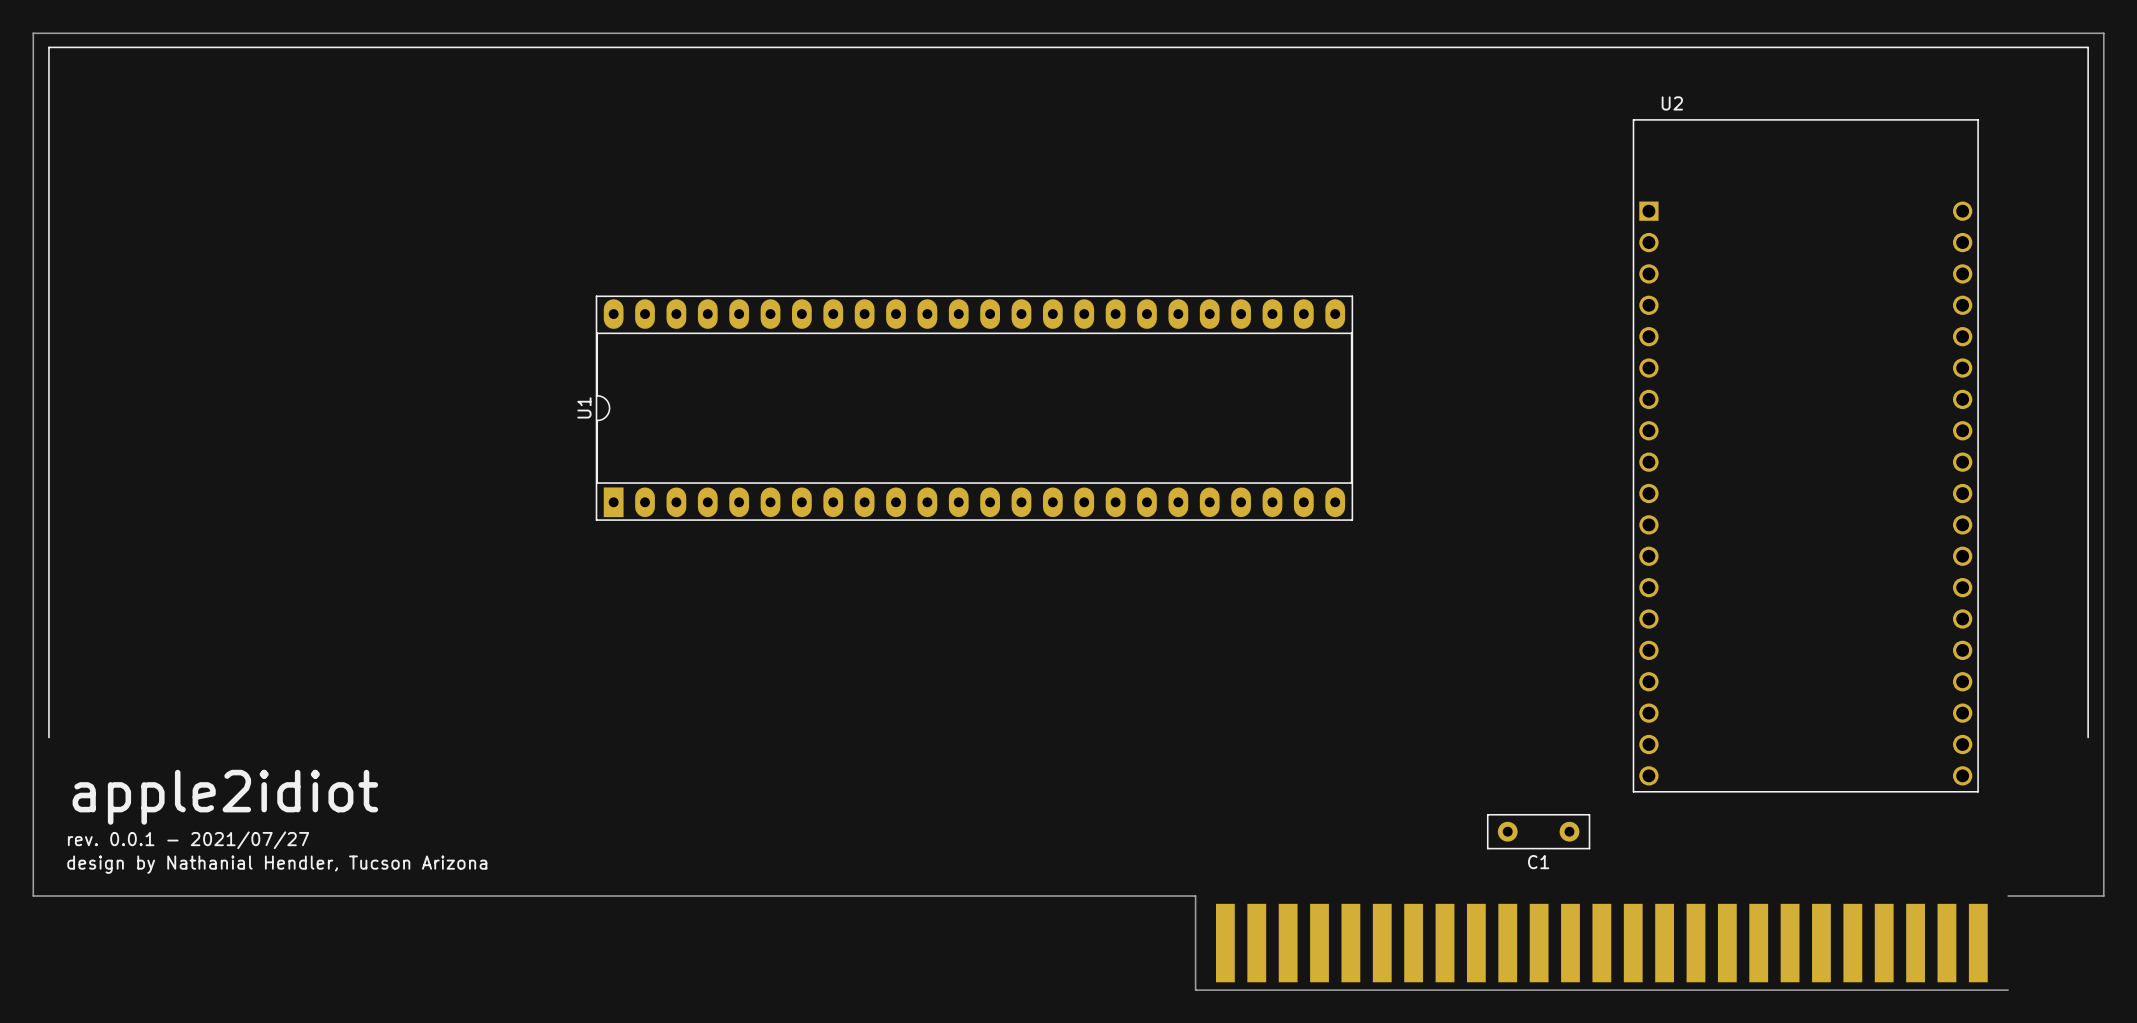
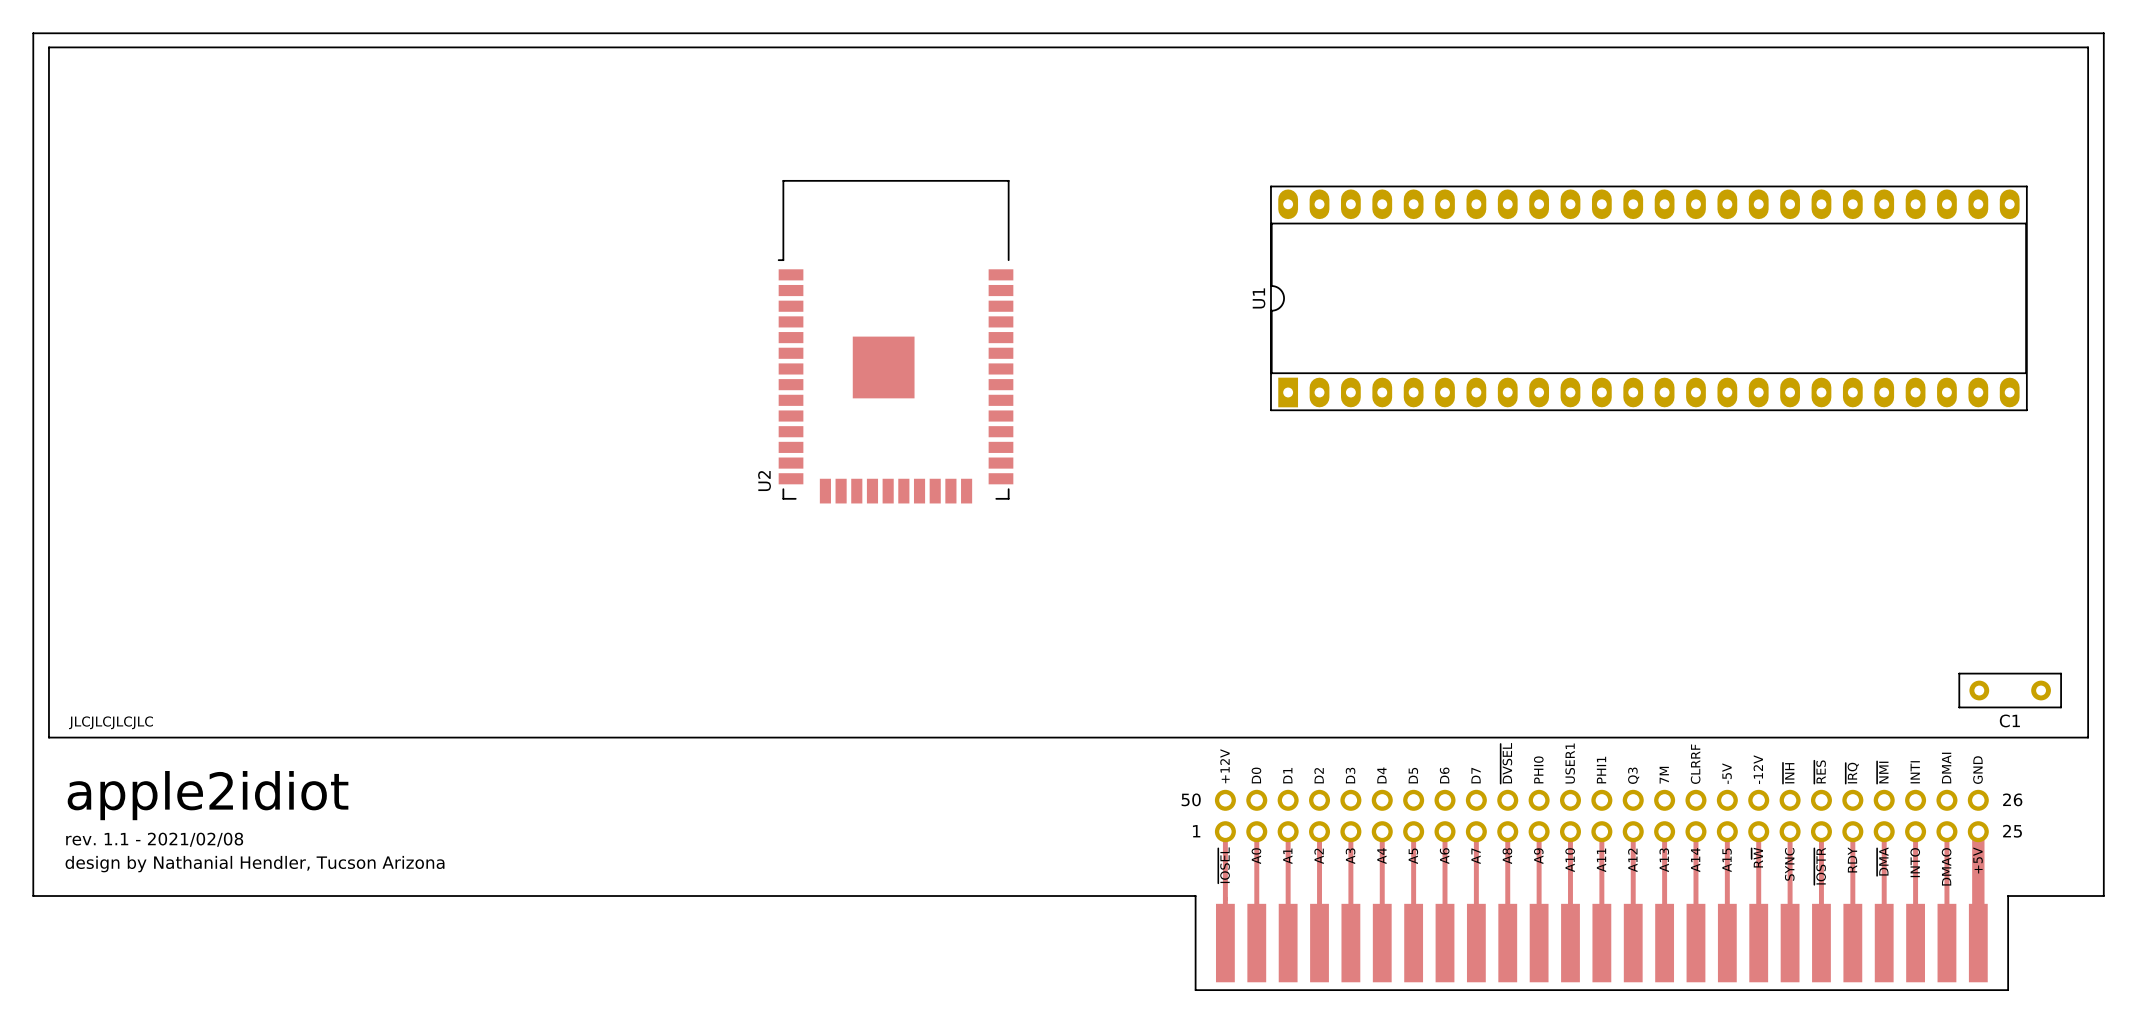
U2 name position: U2 (1672, 103) -> U2 (764, 481)
U2 footprint: [1632, 119, 1979, 793] -> [777, 180, 1014, 504]
U1 position: (974, 408) -> (1648, 298)
text: none -> JLCJLCJLCJLC (111, 722)
line: none -> (48, 737) (2088, 737)
text: none -> USER1 (1570, 763)
text: none -> CLRRF (1695, 764)
text: none -> ~{DVSEL} (1506, 763)
text: none -> +12V (1224, 766)
text: none -> -12V (1758, 769)
text: none -> PHI0 (1538, 769)
text: none -> PHI1 (1601, 770)
text: none -> DMAI (1946, 768)
text: none -> -5V (1727, 773)
text: none -> GND (1977, 770)
text: none -> ~{RES} (1820, 772)
text: none -> INTI (1915, 772)
text: none -> ~{INH} (1788, 773)
text: none -> ~{IRQ} (1852, 773)
text: none -> ~{NMI} (1882, 772)
text: none -> D0 (1256, 775)
text: none -> D1 (1287, 775)
text: none -> D2 (1319, 775)
text: none -> D3 (1350, 775)
text: none -> D4 (1381, 775)
text: none -> D5 (1413, 775)
text: none -> D6 (1444, 775)
text: none -> D7 (1476, 775)
text: none -> Q3 (1633, 775)
text: none -> 7M (1664, 775)
text: none -> 50 (1191, 799)
text: none -> 26 (2012, 799)
part: none -> (1601, 816)
text: none -> 1 (1196, 831)
track: none -> (1225, 831) (1225, 943)
track: none -> (1256, 831) (1256, 943)
track: none -> (1288, 831) (1288, 943)
track: none -> (1319, 831) (1319, 943)
track: none -> (1350, 831) (1350, 943)
track: none -> (1382, 831) (1382, 943)
track: none -> (1413, 831) (1413, 943)
track: none -> (1445, 831) (1445, 943)
track: none -> (1476, 831) (1476, 943)
track: none -> (1507, 831) (1507, 943)
C1 position: (1538, 831) -> (2010, 690)
track: none -> (1539, 831) (1539, 943)
track: none -> (1570, 831) (1570, 943)
track: none -> (1601, 831) (1601, 943)
track: none -> (1633, 831) (1633, 943)
track: none -> (1664, 831) (1664, 943)
track: none -> (1695, 831) (1695, 943)
track: none -> (1727, 831) (1727, 943)
track: none -> (1758, 831) (1758, 943)
track: none -> (1790, 831) (1790, 943)
track: none -> (1821, 831) (1821, 943)
track: none -> (1852, 831) (1852, 943)
track: none -> (1884, 831) (1884, 943)
track: none -> (1915, 831) (1915, 943)
track: none -> (1946, 831) (1946, 943)
track: none -> (1978, 831) (1978, 943)
text: none -> 25 (2012, 831)
text: rev. 0.0.1 - 2021/07/27 (188, 840) -> rev. 1.1 - 2021/02/08 (154, 839)
text: none -> A4 (1381, 856)
text: none -> A7 (1476, 856)
text: none -> A0 (1256, 856)
text: none -> A1 (1287, 856)
text: none -> A2 (1319, 856)
text: none -> A3 (1350, 856)
text: none -> A5 (1413, 856)
text: none -> A6 (1444, 856)
text: none -> A8 (1507, 856)
text: none -> A9 (1538, 856)
text: none -> R~{W} (1757, 857)
text: none -> RDY (1852, 859)
text: none -> A10 (1570, 860)
text: none -> A11 (1601, 860)
text: none -> A12 (1632, 860)
text: none -> A13 (1664, 860)
text: none -> A14 (1695, 860)
text: none -> A15 (1727, 860)
text: none -> +5V (1978, 860)
text: none -> ~{DMA} (1882, 861)
text: none -> INTO (1915, 862)
text: none -> SYNC (1789, 864)
text: none -> DMAO (1946, 866)
text: none -> ~{IOSEL} (1224, 865)
text: none -> ~{IOSTR} (1820, 866)
board edge: none -> (2008, 896) (2008, 990)

